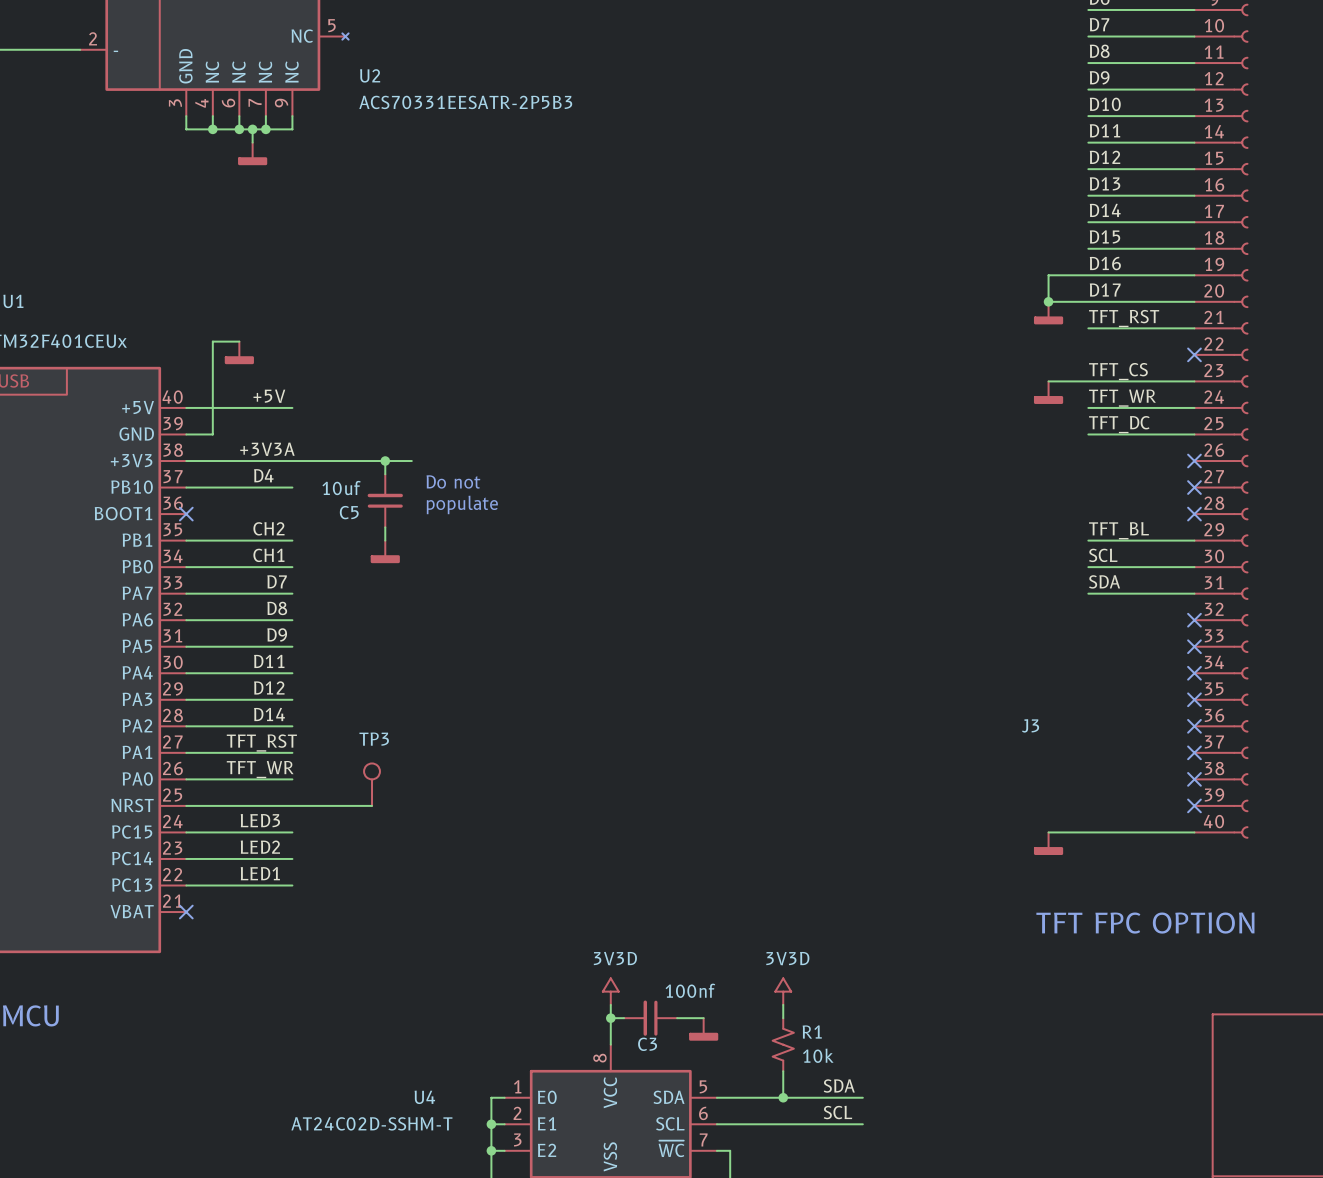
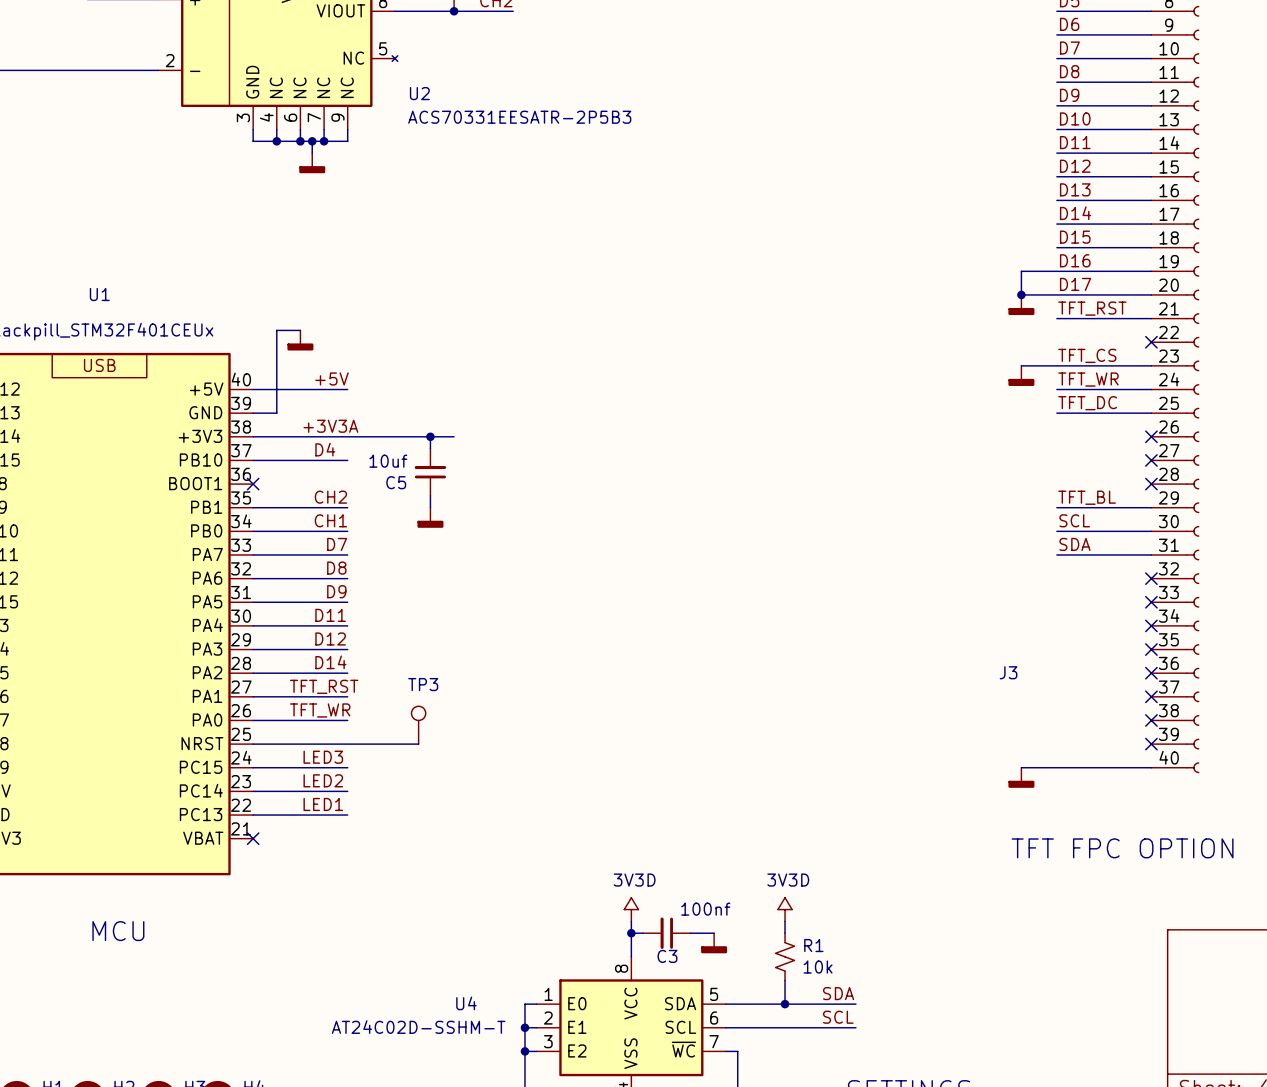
text: Do not (453, 481) -> none
text: populate (462, 504) -> none

